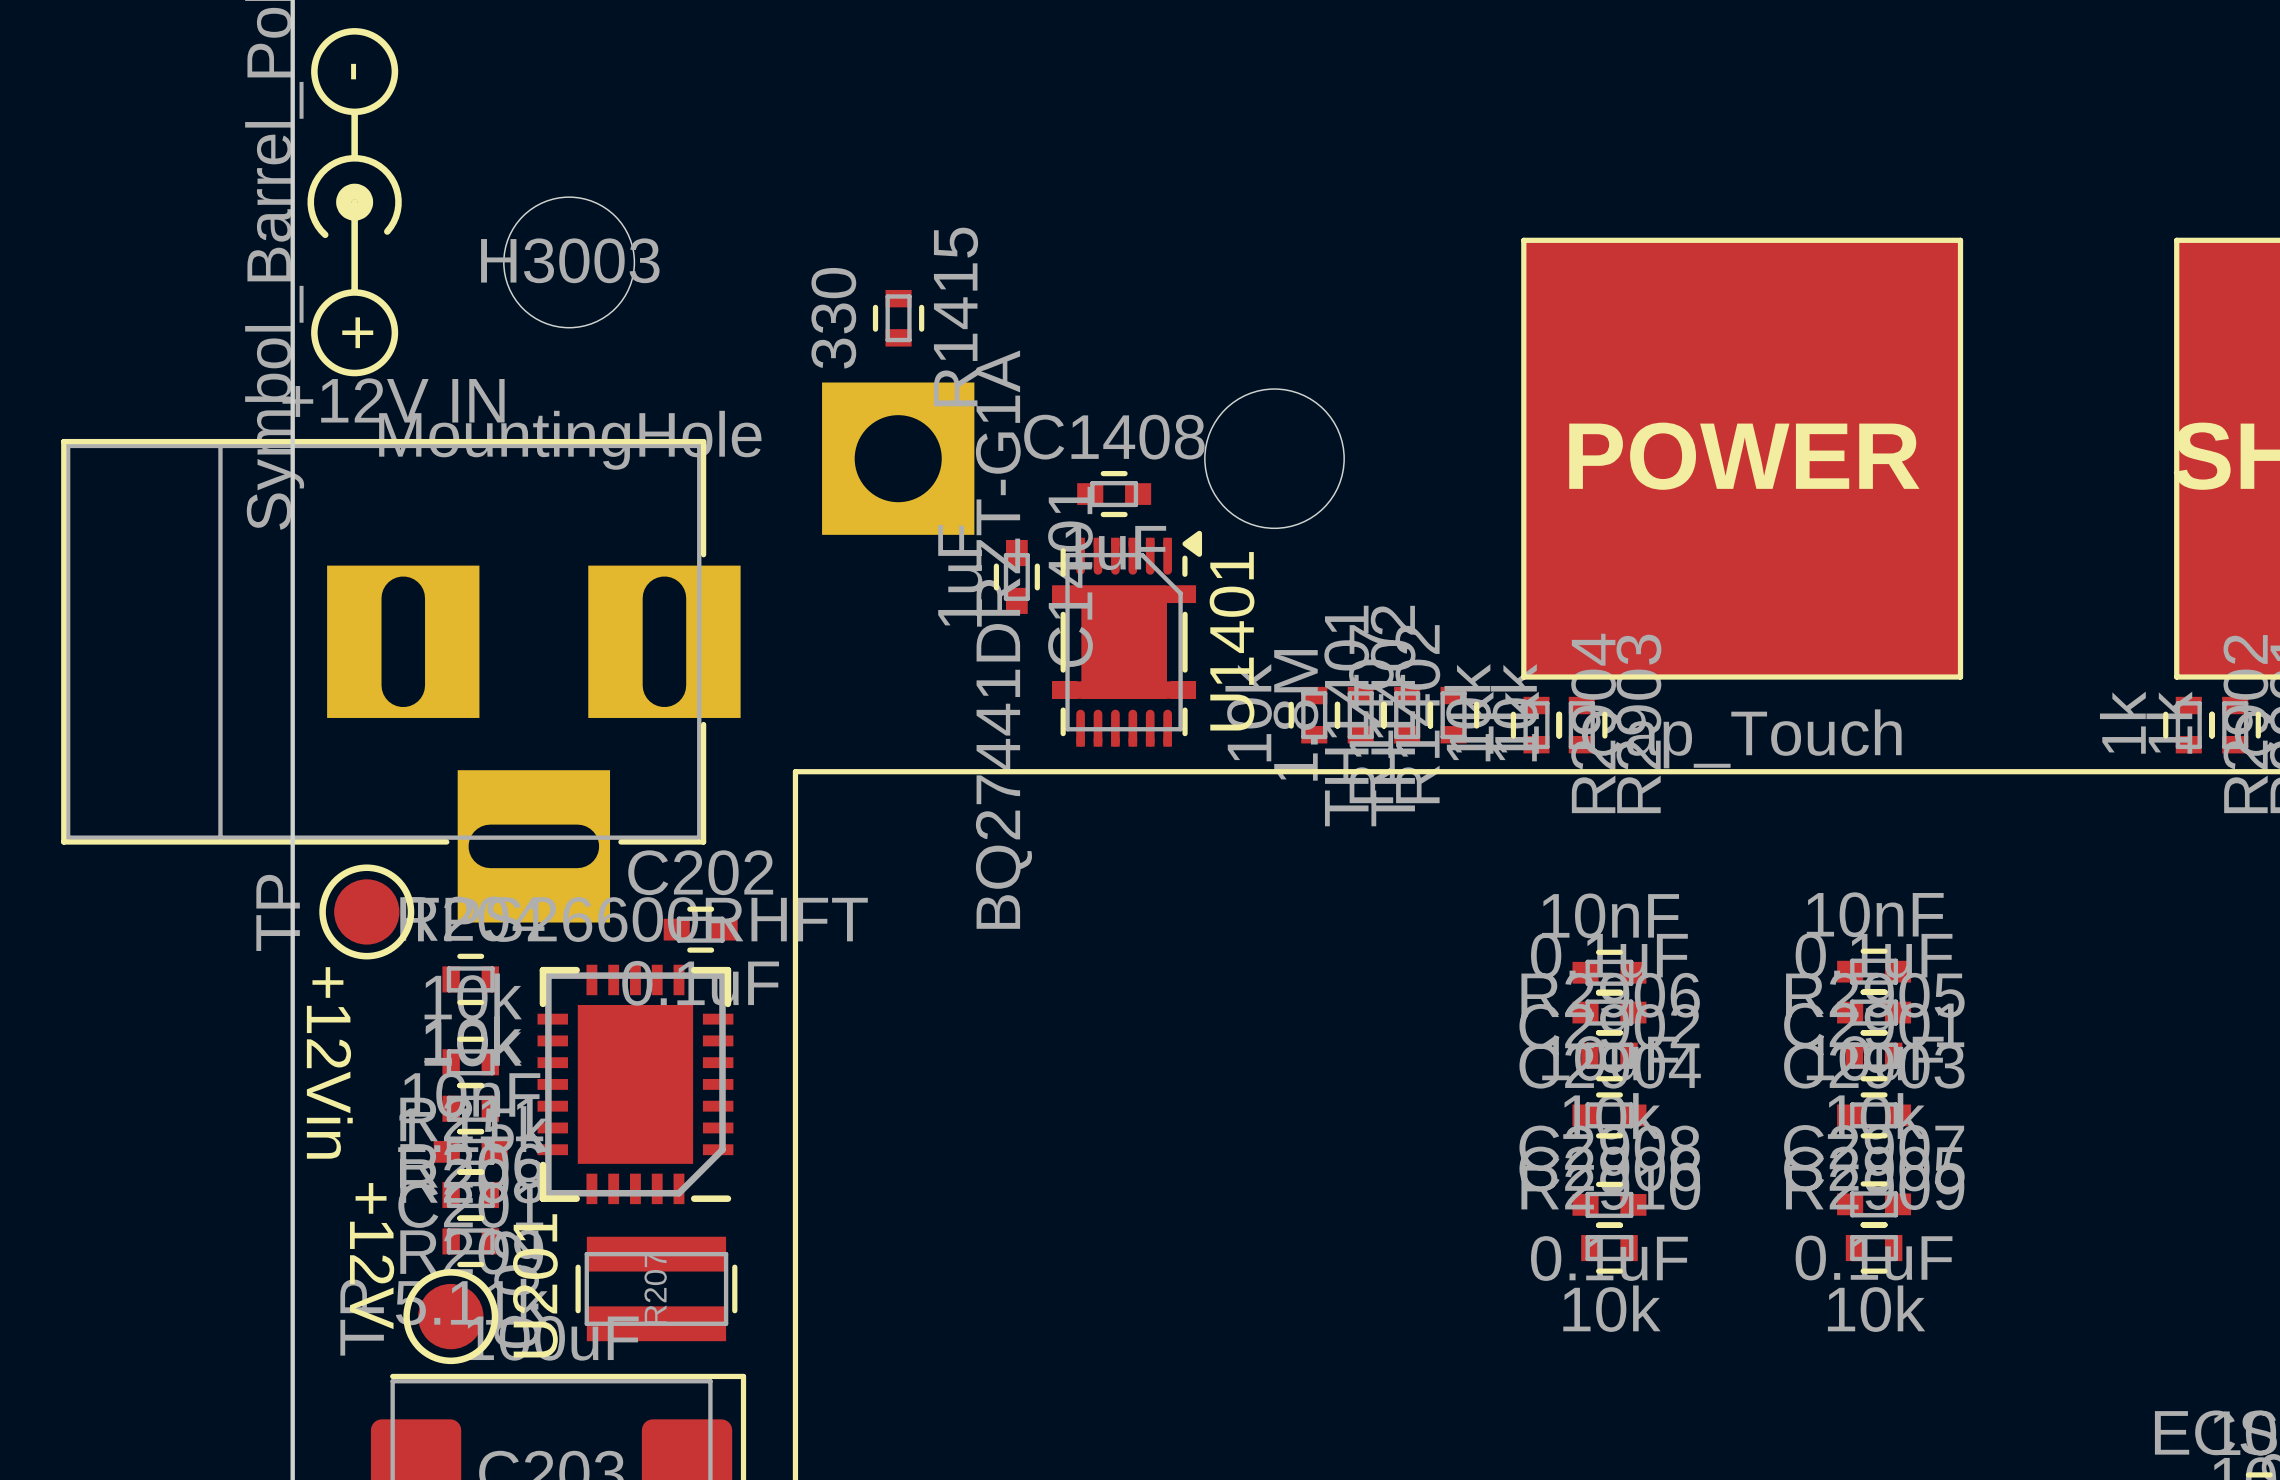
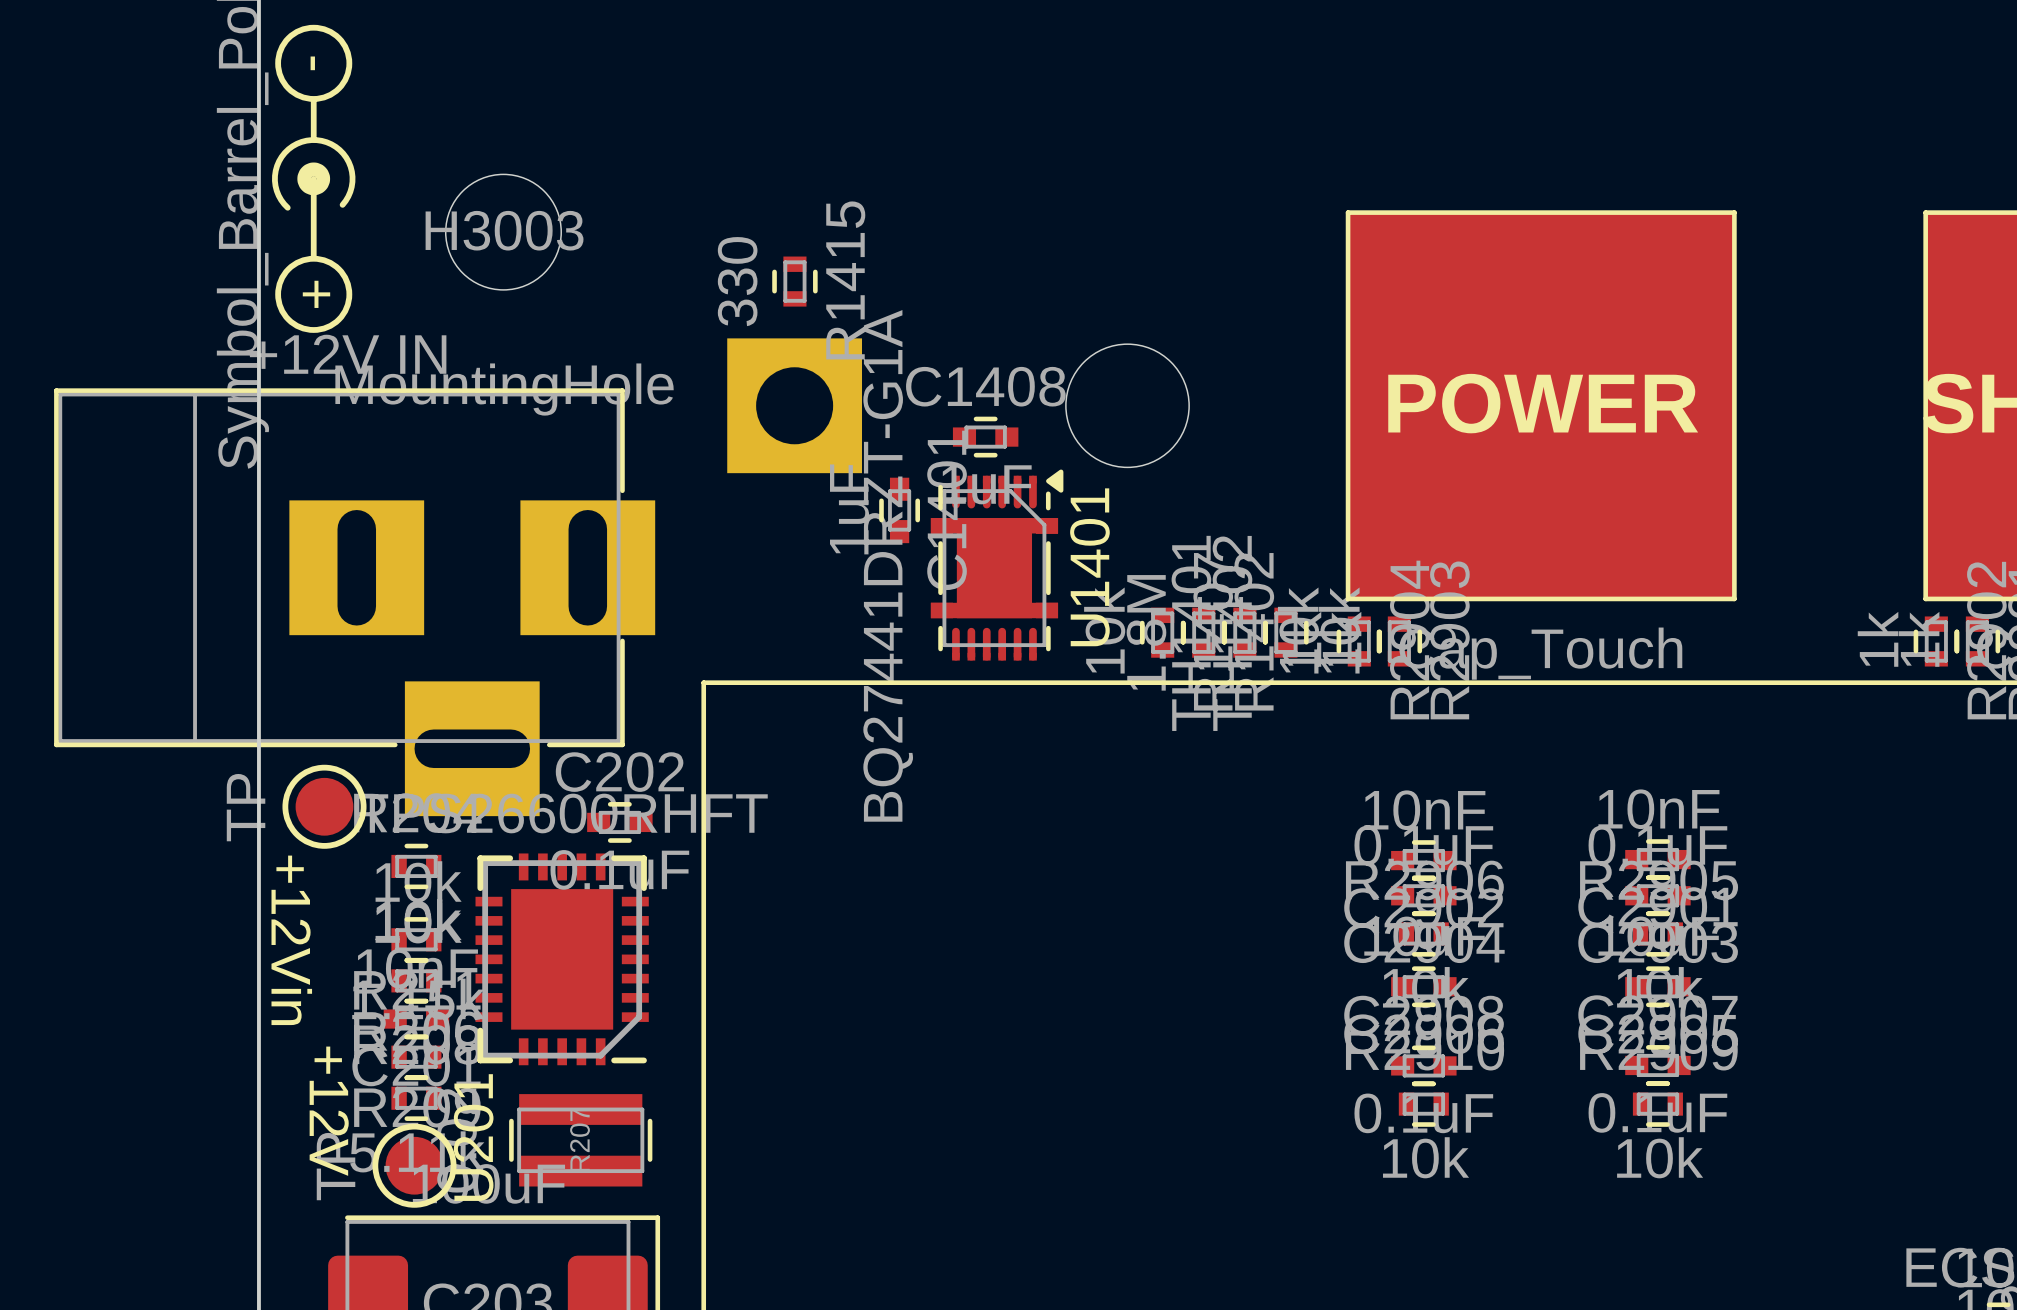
part position: (450, 1316) -> (414, 1165)

